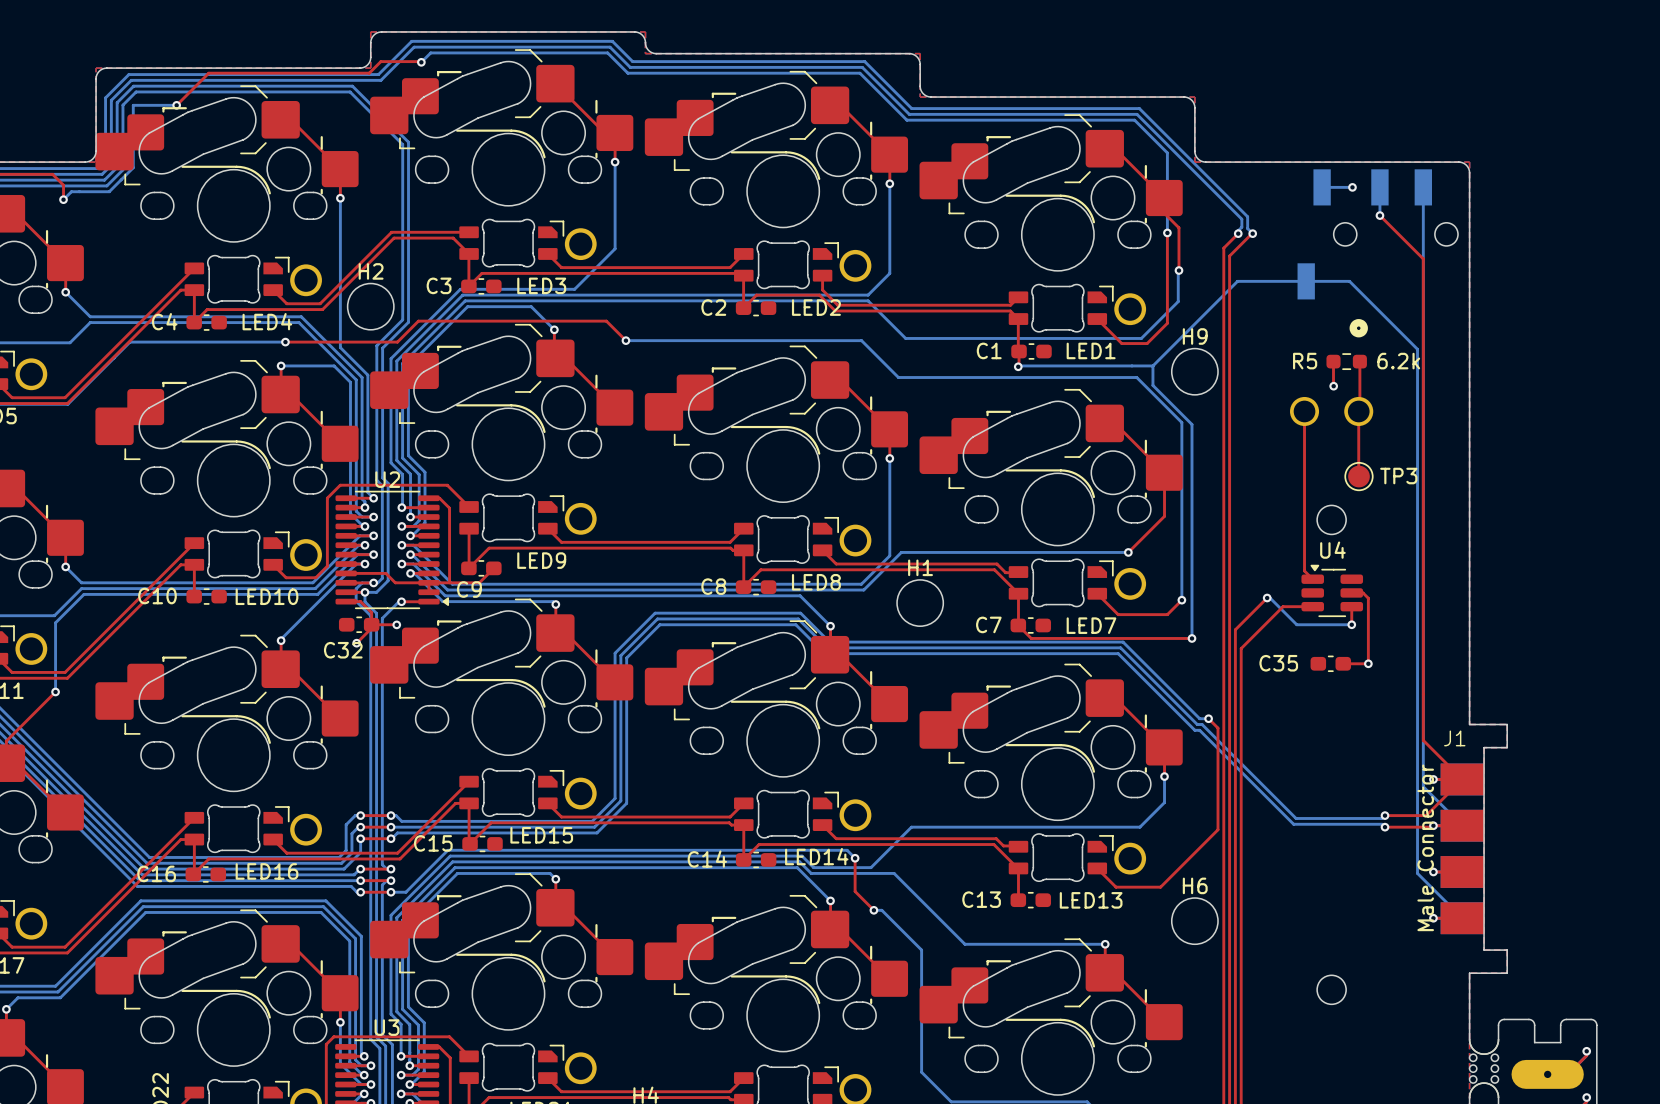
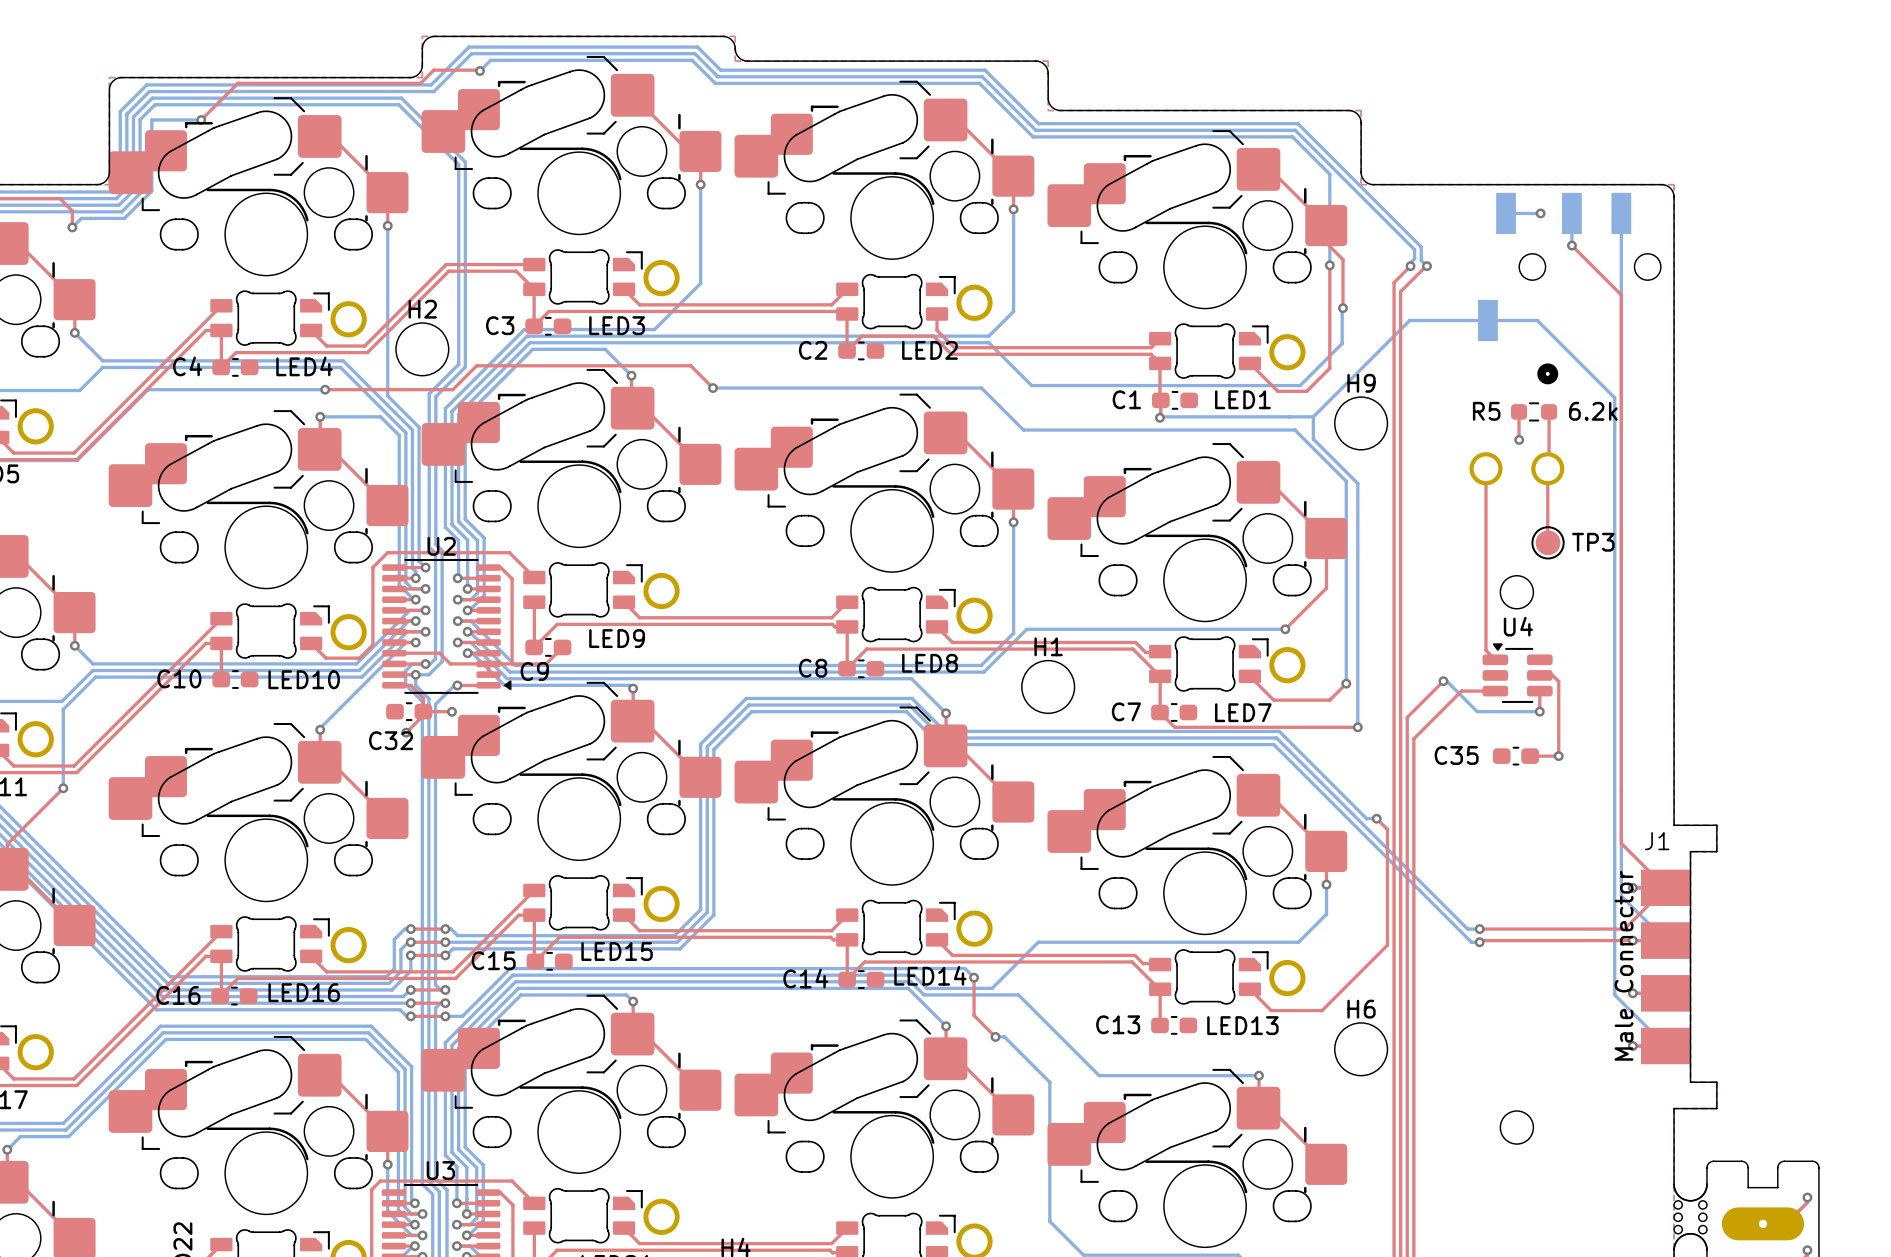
bottom track: (1197, 724) (1202, 724) (1296, 818) (1382, 818) (1385, 815) -> (1363, 825) (1467, 929) (1479, 929)
bottom track: (1194, 730) (1199, 730) (1293, 824) (1382, 824) (1385, 827) -> (1361, 831) (1471, 942) (1479, 942)
top track: none -> (1479, 929) (1577, 929)
via: none -> (1479, 929)
via: (1385, 815) -> none
top track: (1433, 825) (1385, 827) -> (1632, 940) (1481, 940) (1479, 942)
via: none -> (1479, 942)
via: (1385, 827) -> none

